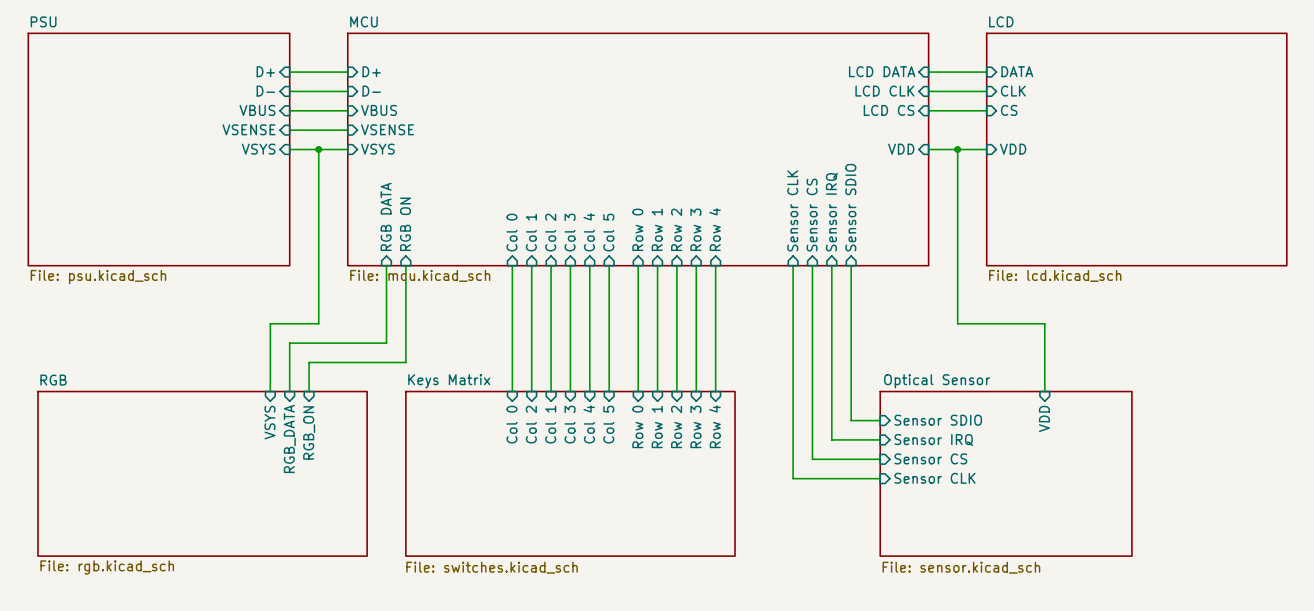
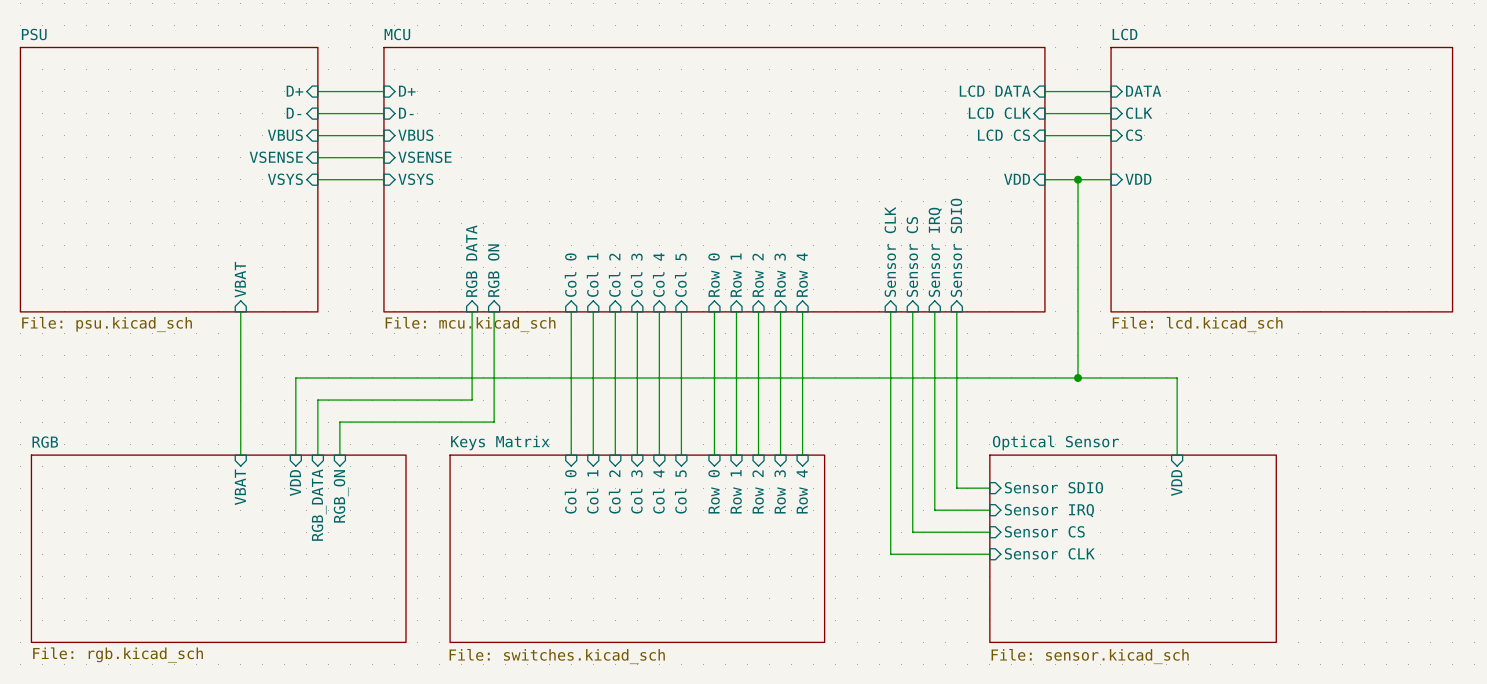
wire: (318, 149) (318, 323) -> (1077, 377) (350, 377)
junction: (318, 149) -> none
sheet pin position: RGB DATA (386, 216) -> RGB DATA (471, 261)
sheet pin position: RGB ON (405, 224) -> RGB ON (493, 270)
sheet pin: none -> VBAT (240, 279)
wire: none -> (240, 311) (240, 455)
wire: (386, 265) (386, 343) -> (472, 311) (472, 400) (428, 400)
wire: (405, 265) (405, 362) -> (494, 311) (494, 422) (450, 422)
junction: none -> (1077, 377)
sheet pin: none -> VBAT (240, 487)
sheet pin: VSYS (269, 422) -> VDD (295, 483)
sheet pin: Col 2 (531, 424) -> Col 1 (592, 491)
sheet pin: Col 1 (550, 424) -> Col 2 (614, 491)

